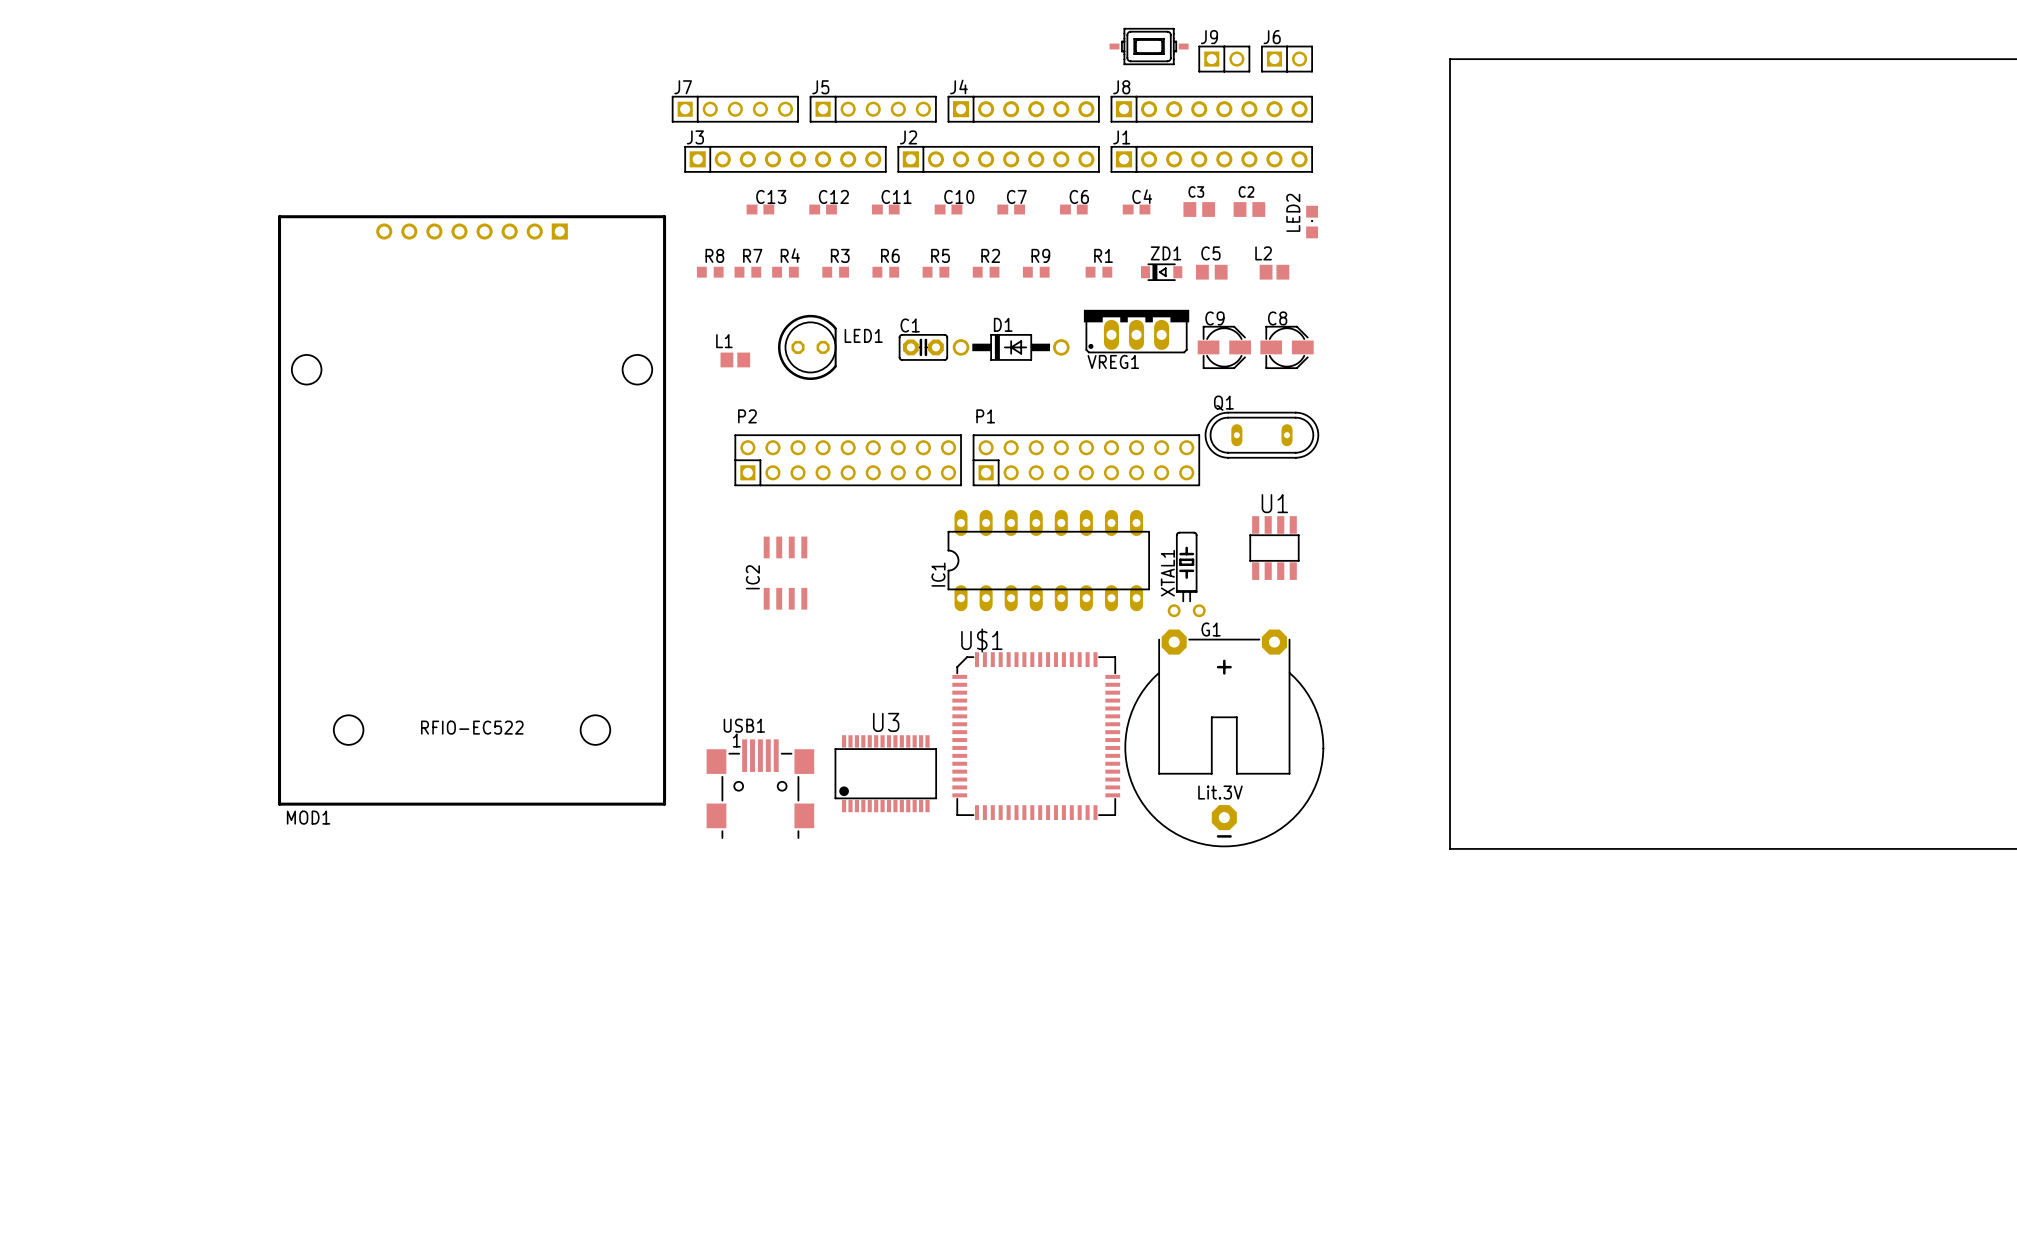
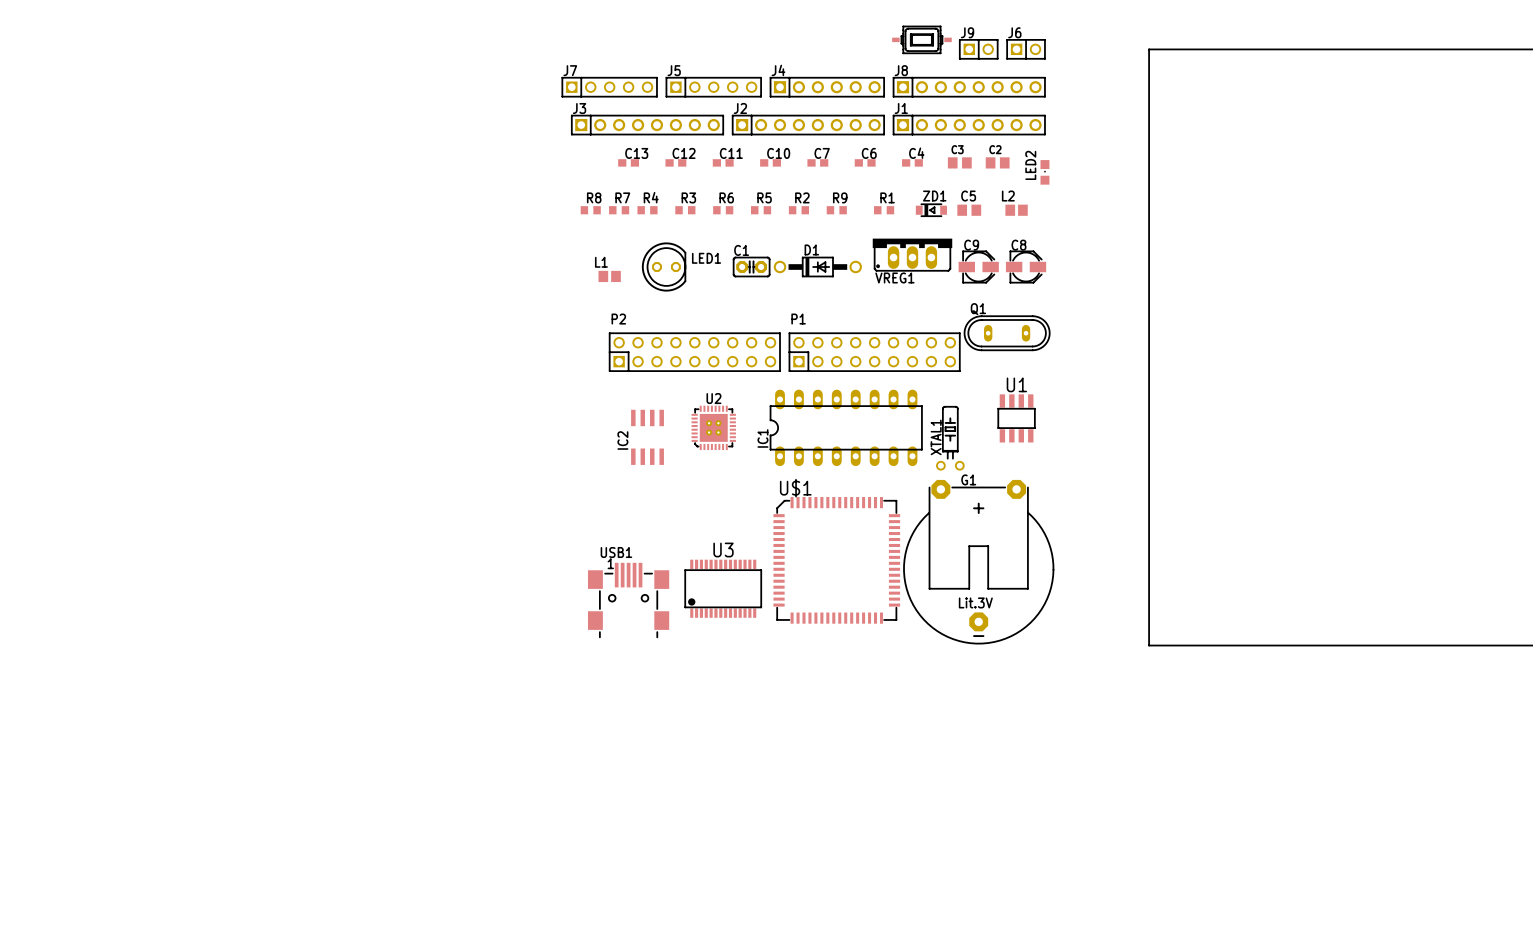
MOD1: (472, 510) -> none
U2: none -> (713, 427)

